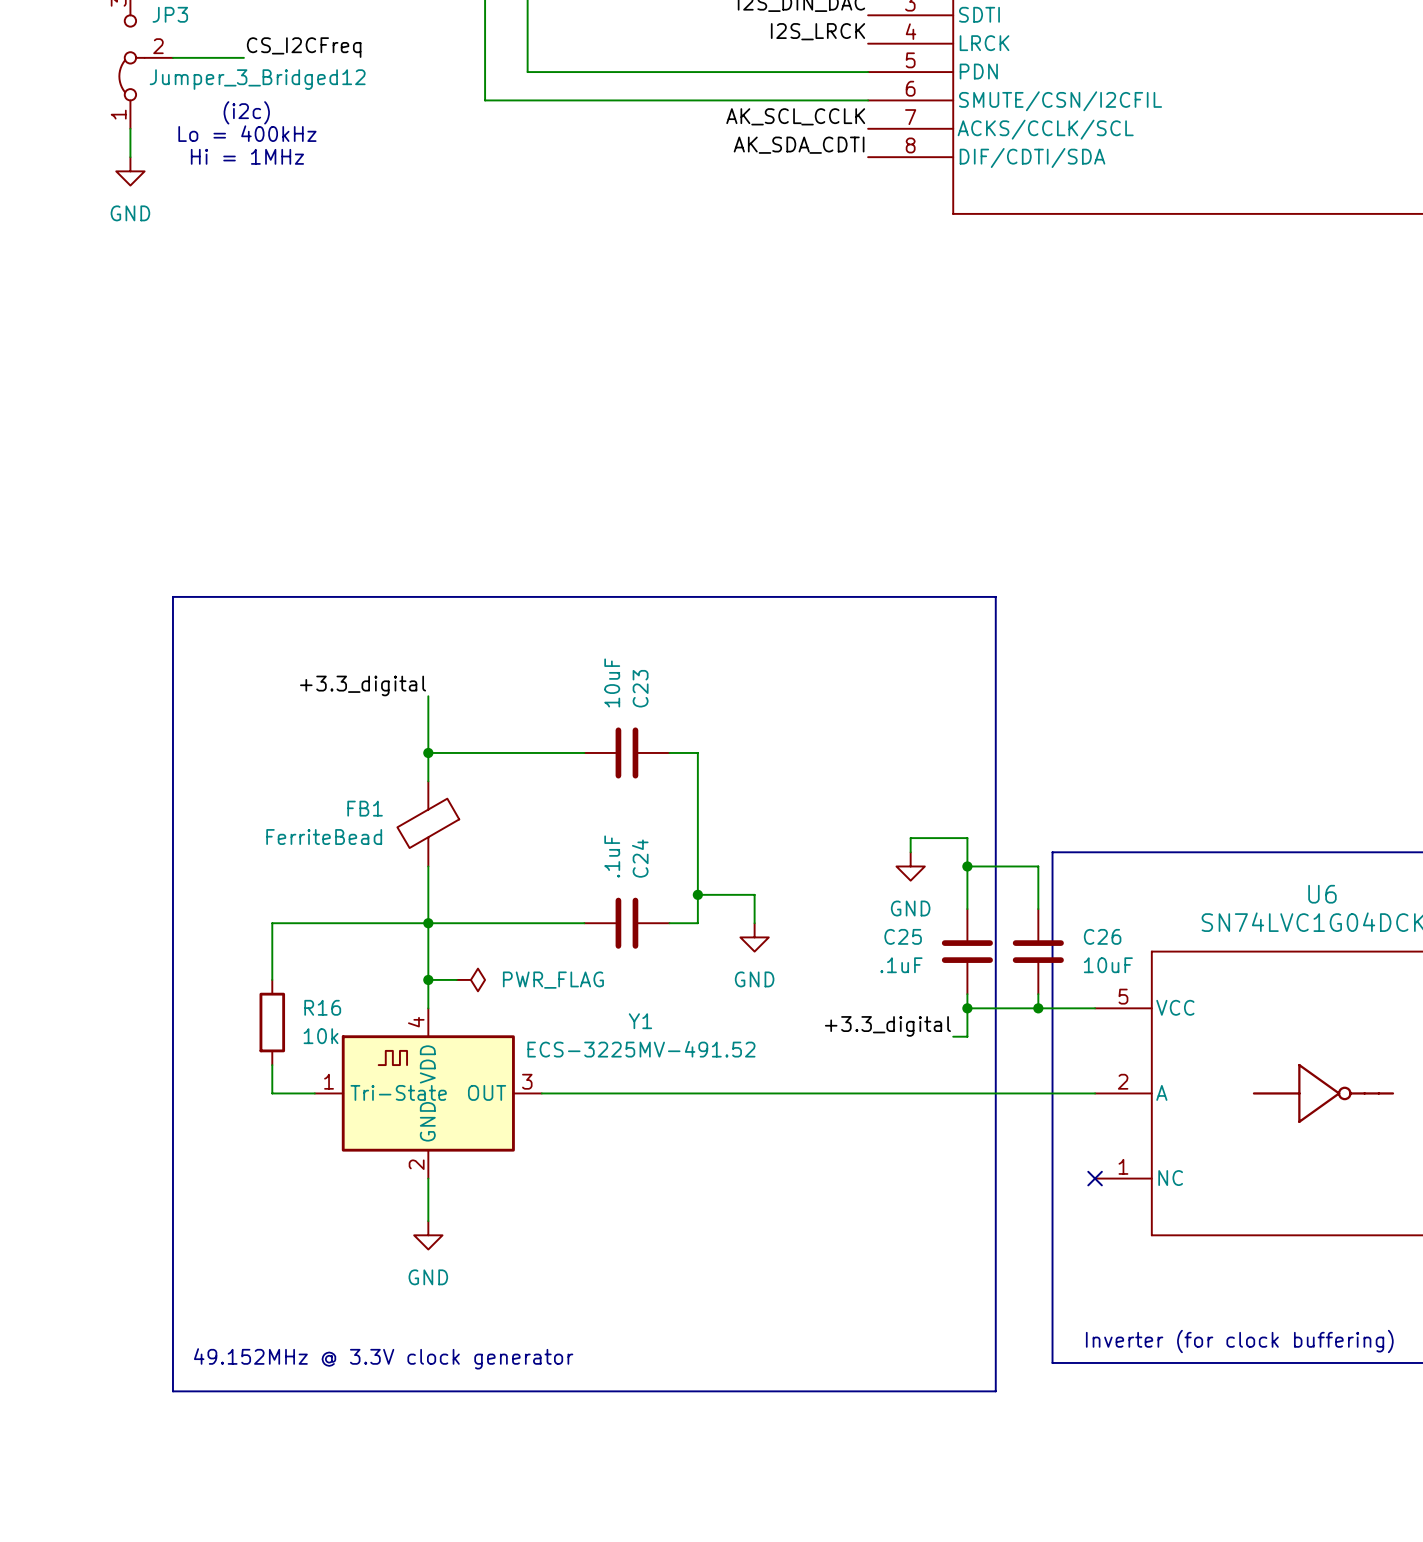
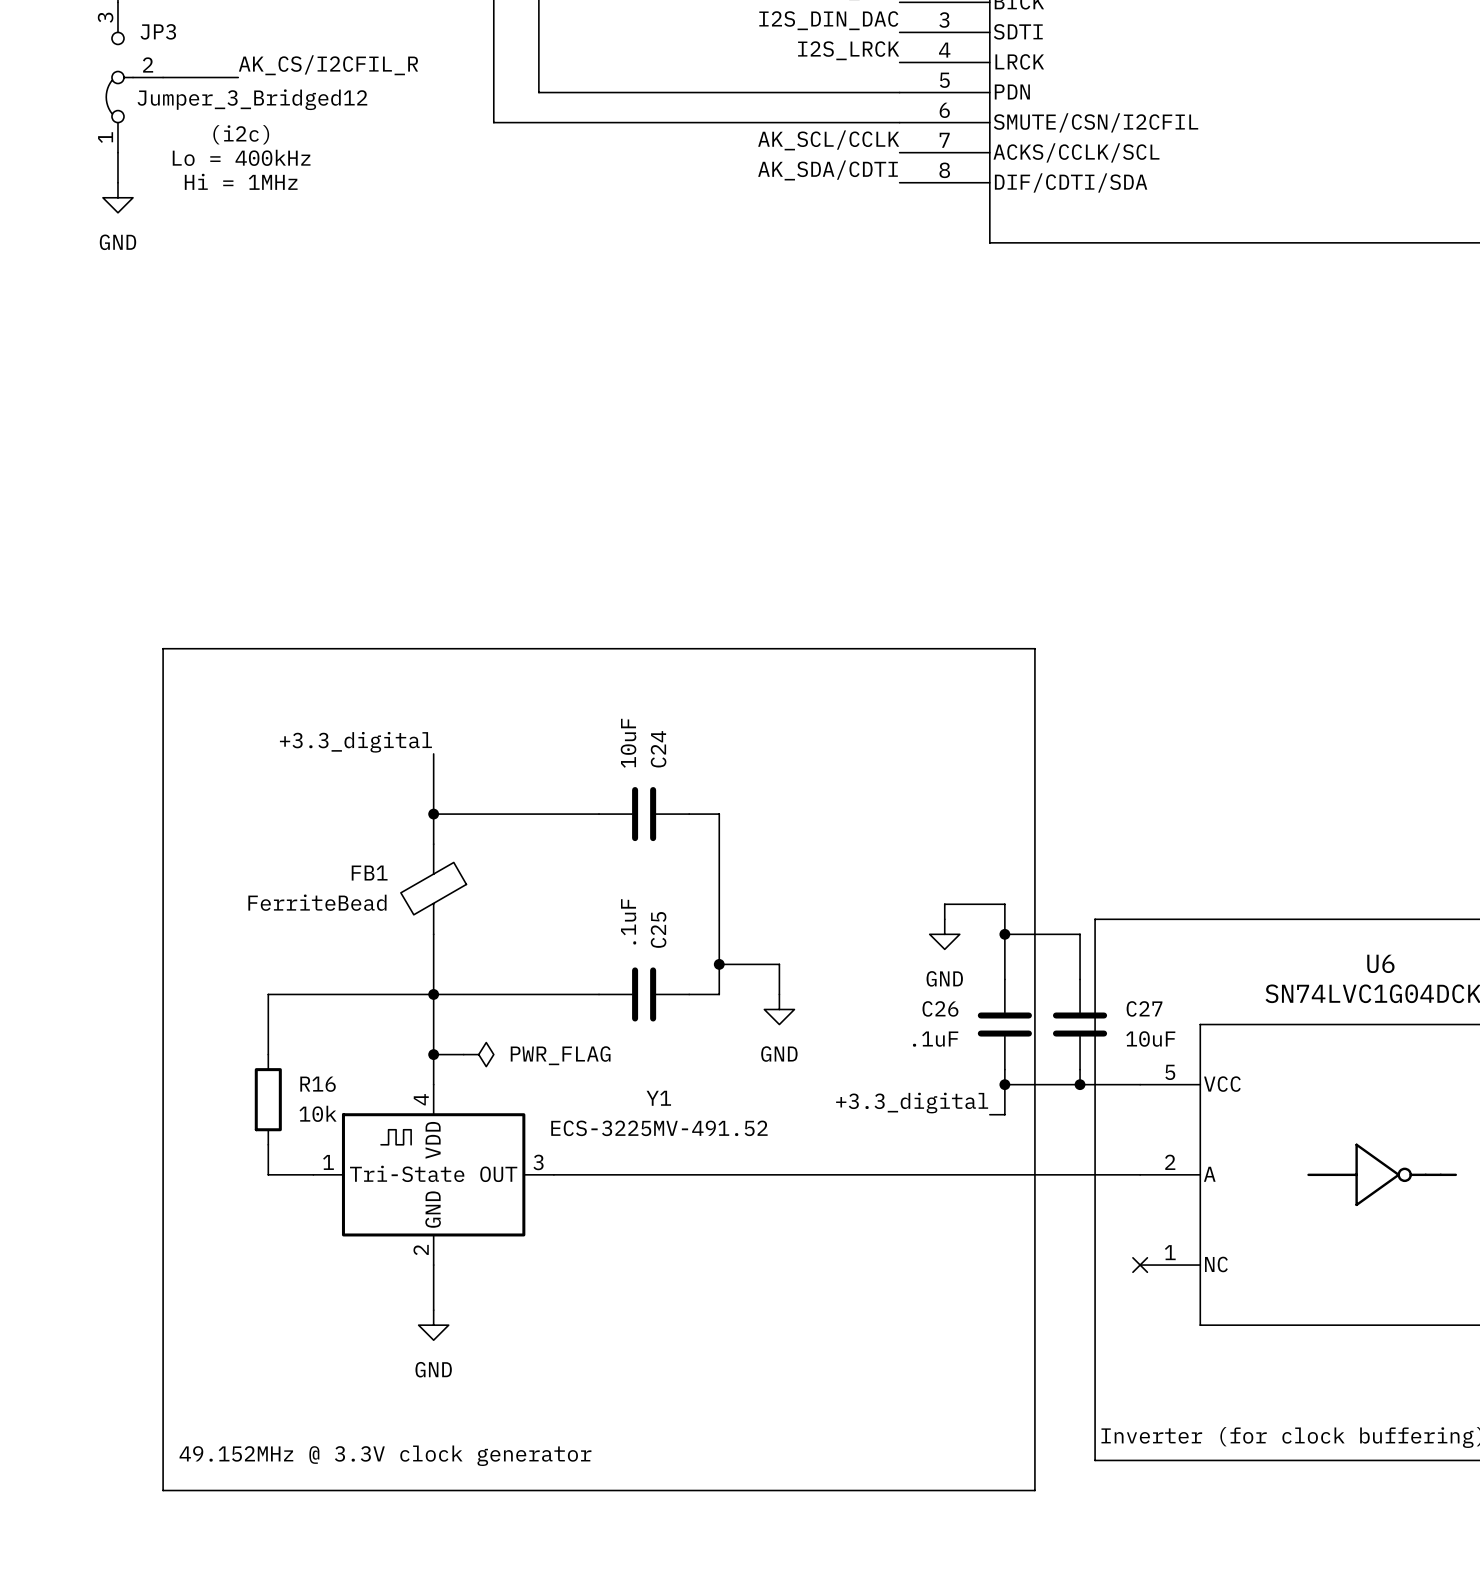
label: CS_I2CFreq (304, 47) -> AK_CS/I2CFIL_R (328, 65)
label: AK_SCL_CCLK (795, 116) -> AK_SCL/CCLK (828, 140)
label: AK_SDA_CDTI (799, 145) -> AK_SDA/CDTI (828, 170)
C23 name: C23 (640, 688) -> C24 (658, 749)
C24 name: C24 (640, 858) -> C25 (658, 929)
C25 name: C25 (903, 936) -> C26 (940, 1008)
C26 name: C26 (1102, 936) -> C27 (1144, 1008)

